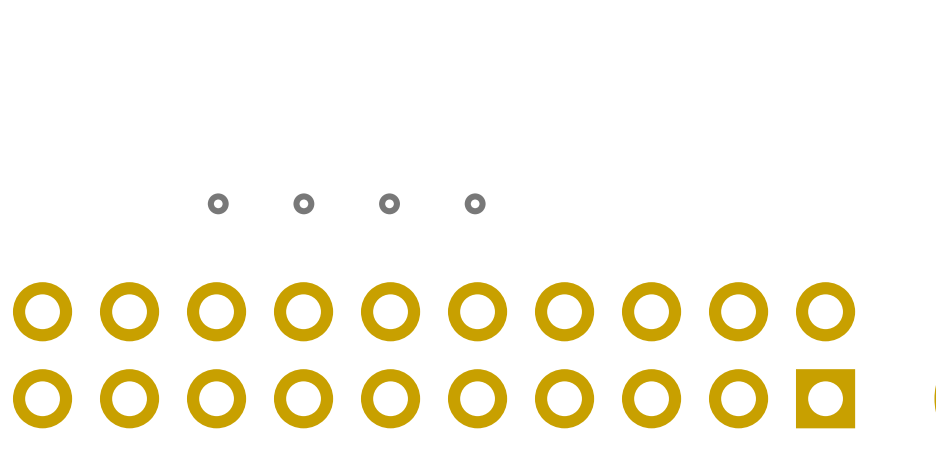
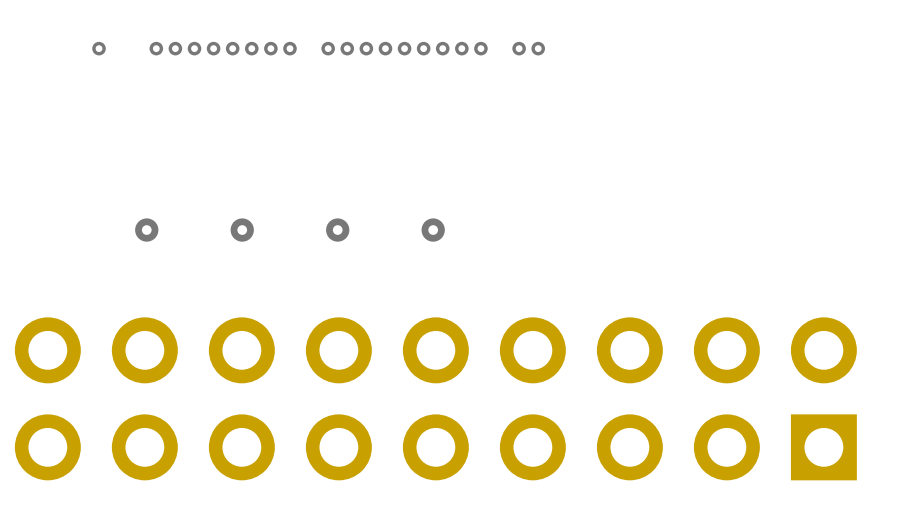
via: none -> (99, 48)
via: none -> (156, 48)
via: none -> (175, 48)
via: none -> (194, 48)
via: none -> (213, 48)
via: none -> (232, 48)
via: none -> (251, 48)
via: none -> (270, 48)
via: none -> (289, 48)
via: none -> (328, 48)
via: none -> (347, 48)
via: none -> (366, 48)
via: none -> (385, 48)
via: none -> (404, 48)
via: none -> (423, 48)
via: none -> (442, 48)
via: none -> (461, 48)
via: none -> (480, 48)
via: none -> (519, 48)
via: none -> (538, 48)

